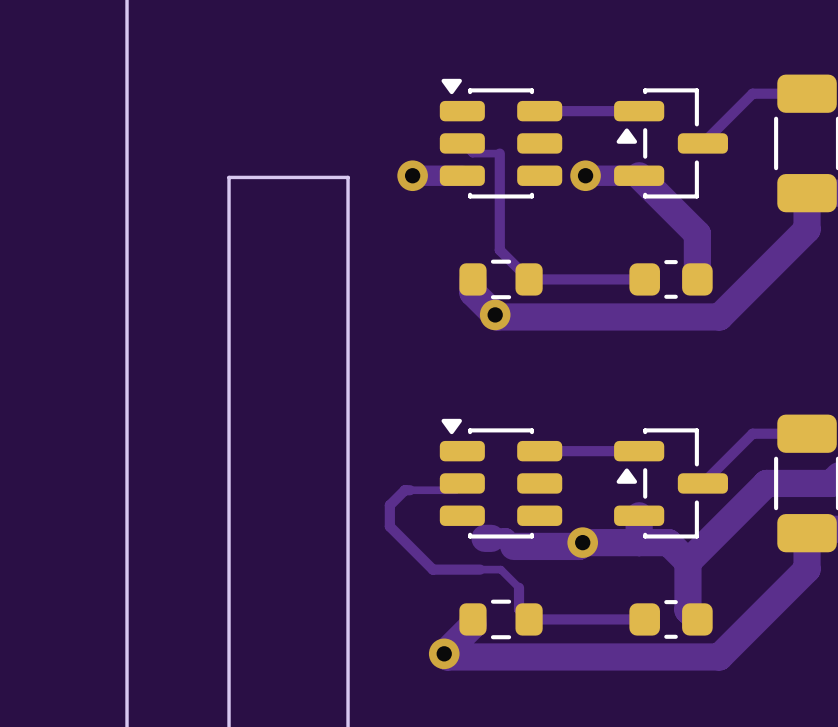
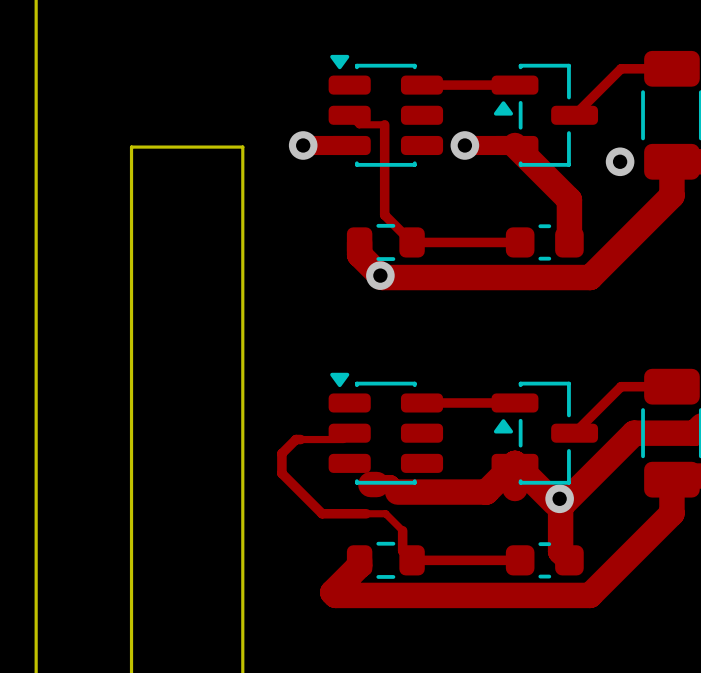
via: none -> (620, 161)
via position: (582, 542) -> (559, 498)
track: (578, 546) (582, 542) (668, 542) (687, 562) -> (458, 492) (486, 492) (514, 463) (555, 503)
via: (444, 653) -> none

